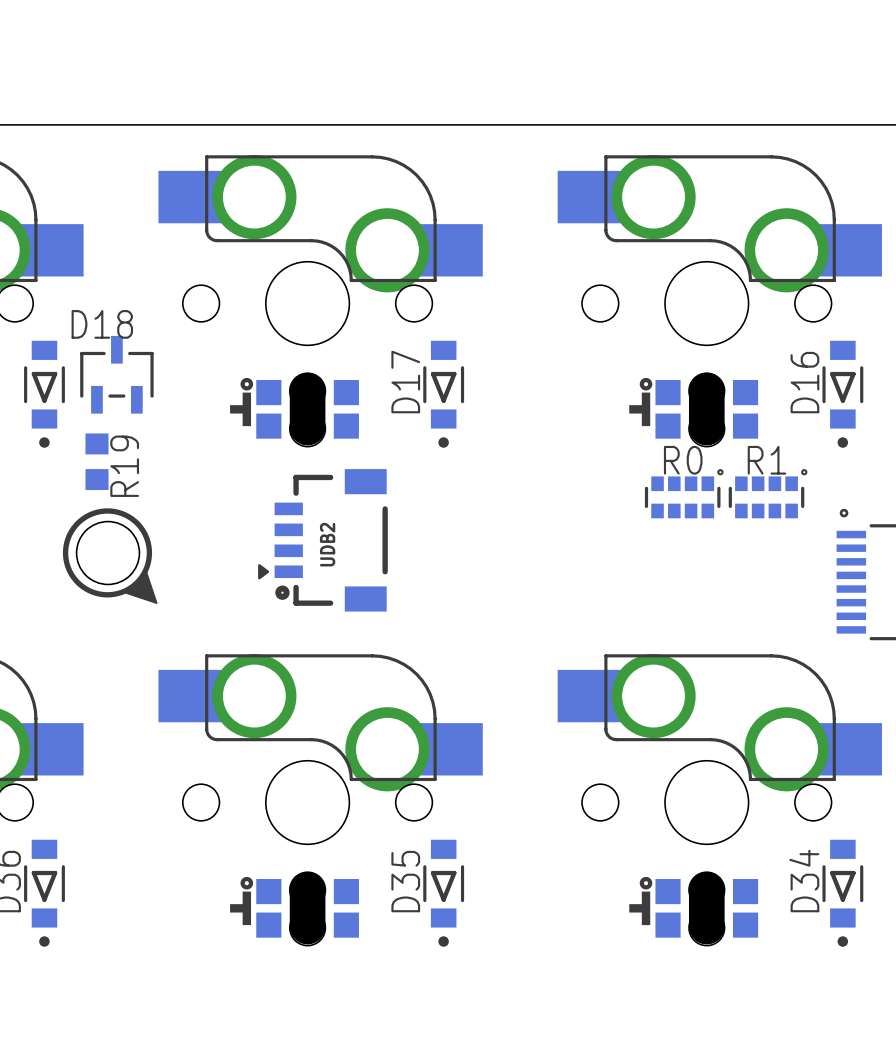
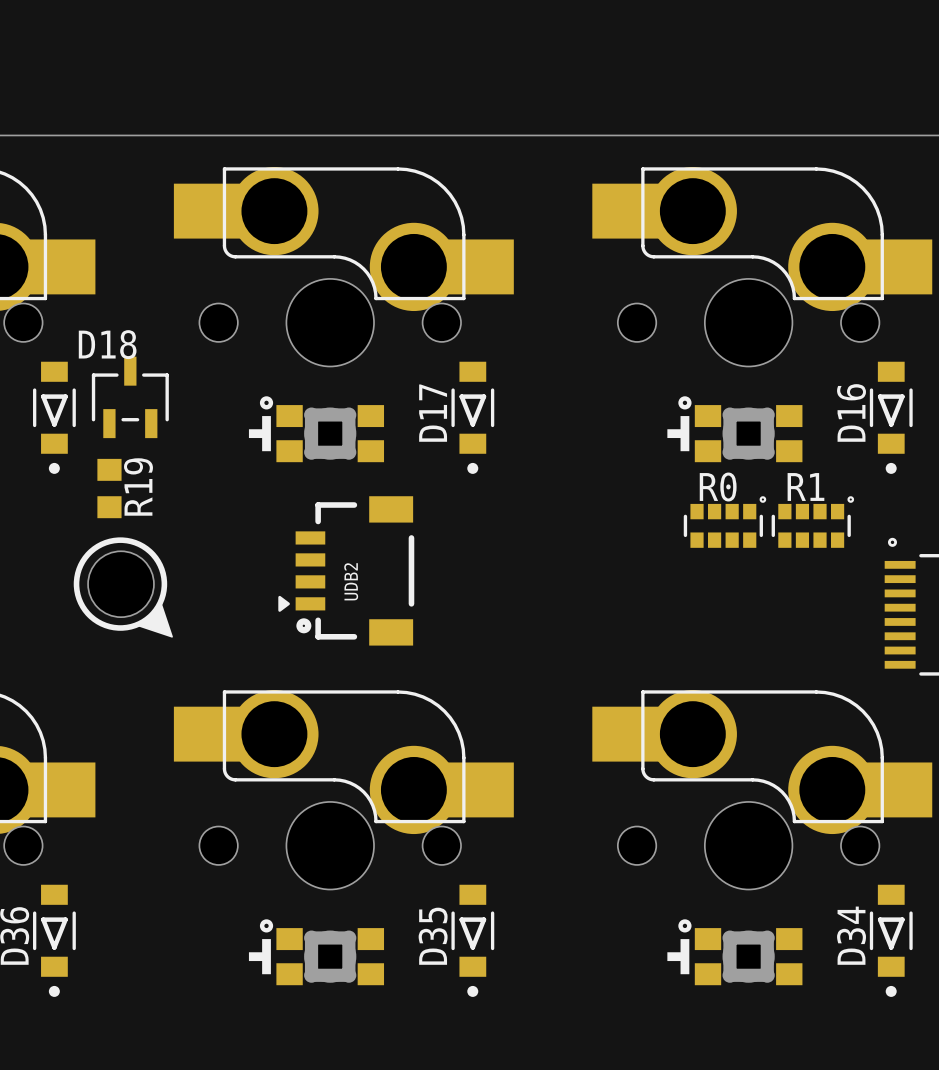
part footprint: [230, 373, 359, 447] -> [248, 396, 385, 463]
part footprint: [629, 373, 759, 447] -> [667, 396, 803, 463]
part footprint: [230, 872, 359, 946] -> [248, 919, 385, 986]
part footprint: [629, 872, 759, 946] -> [667, 919, 803, 986]

